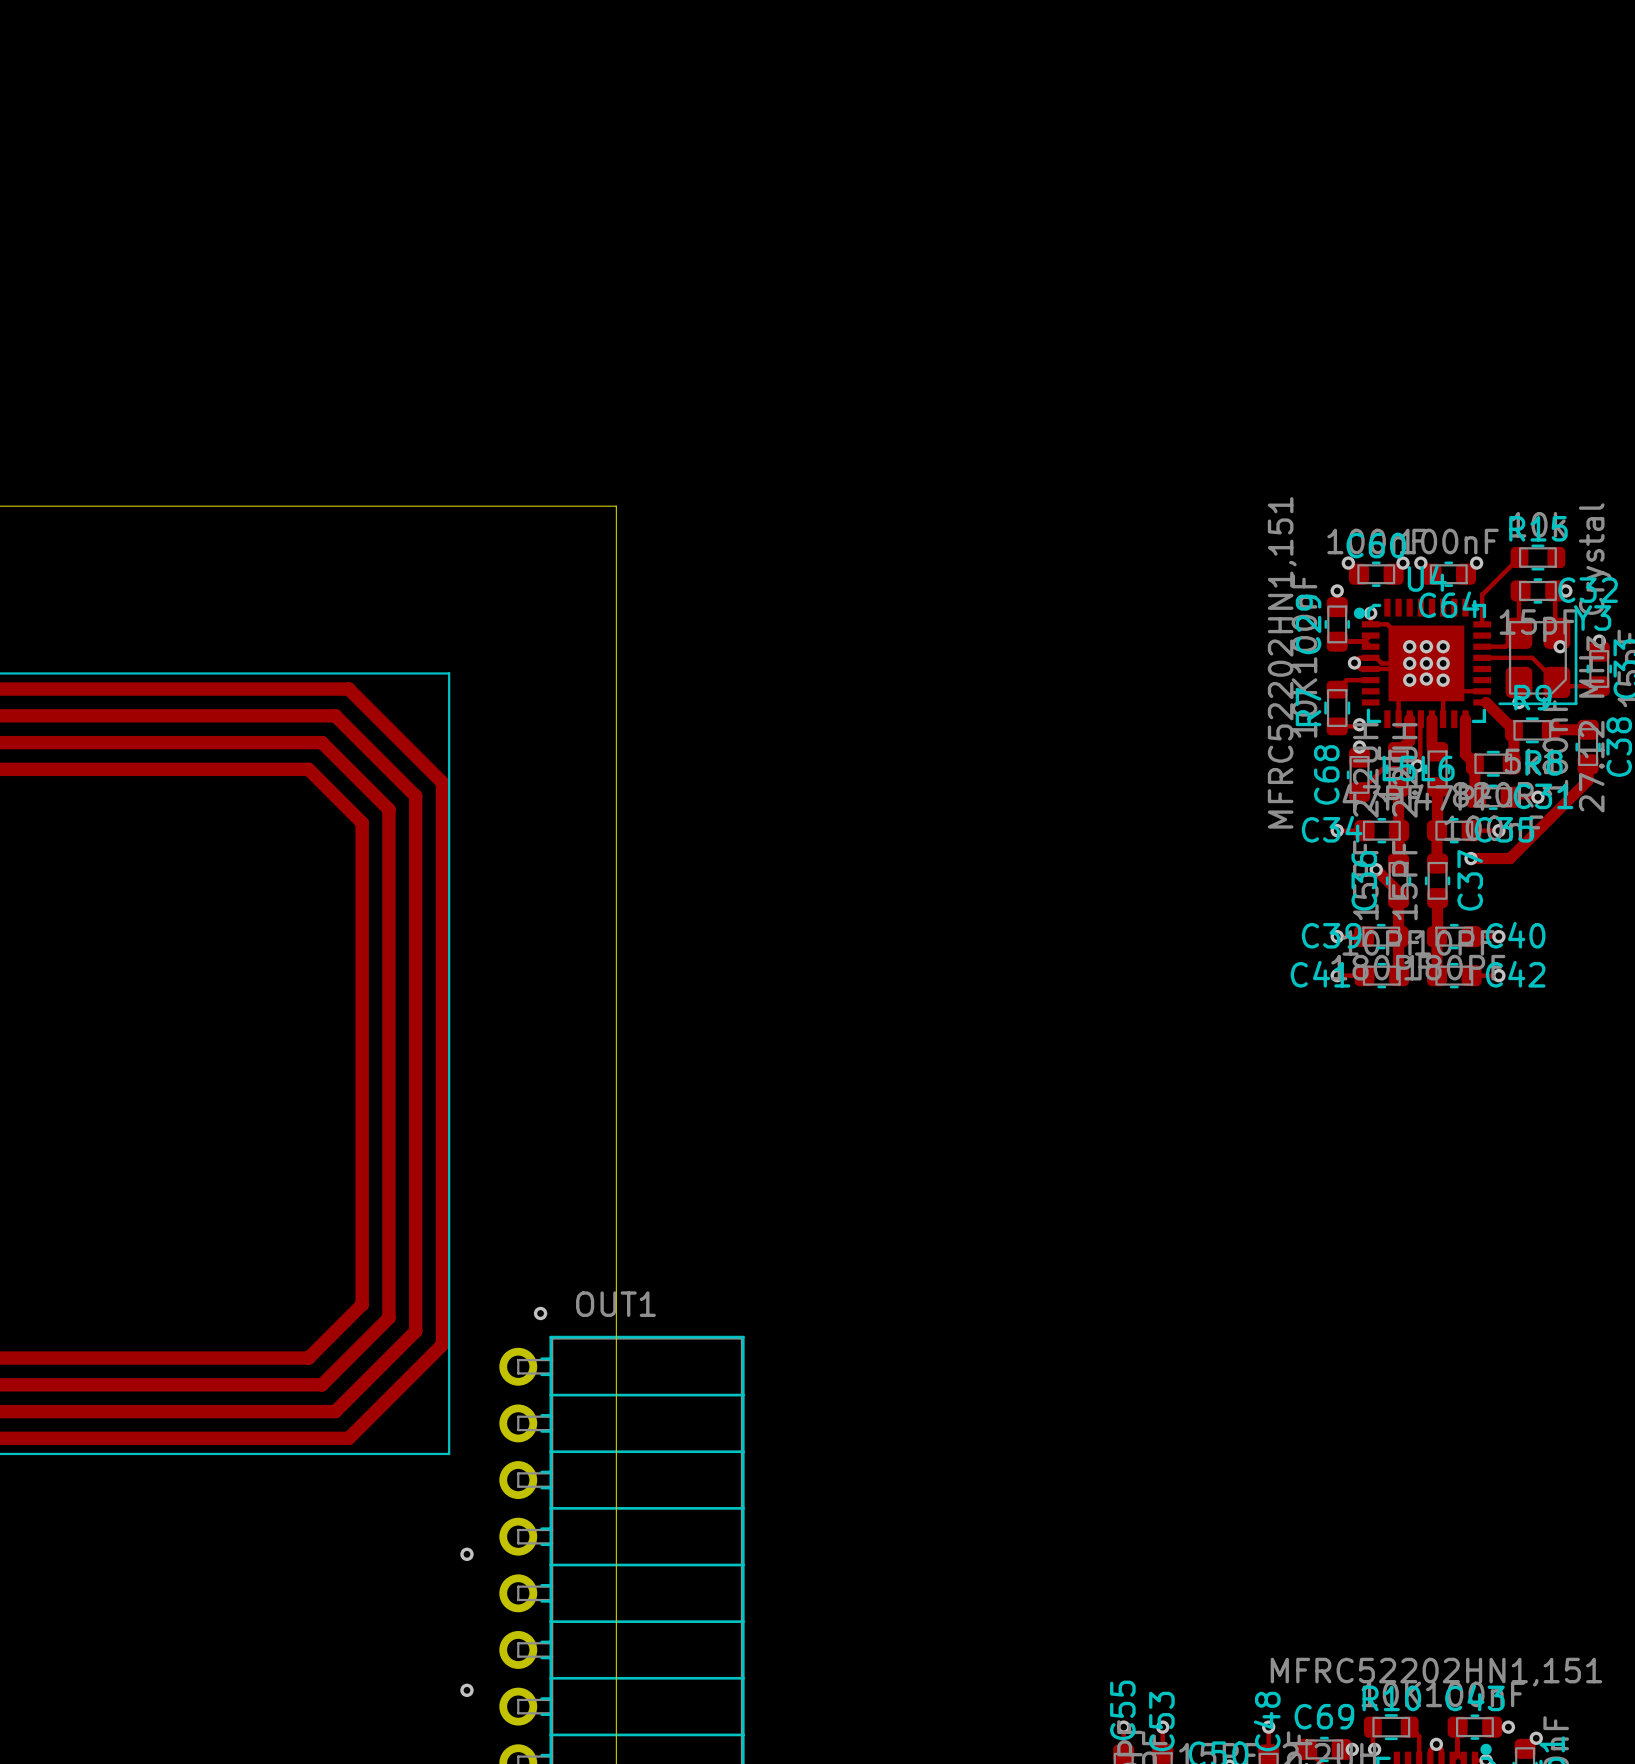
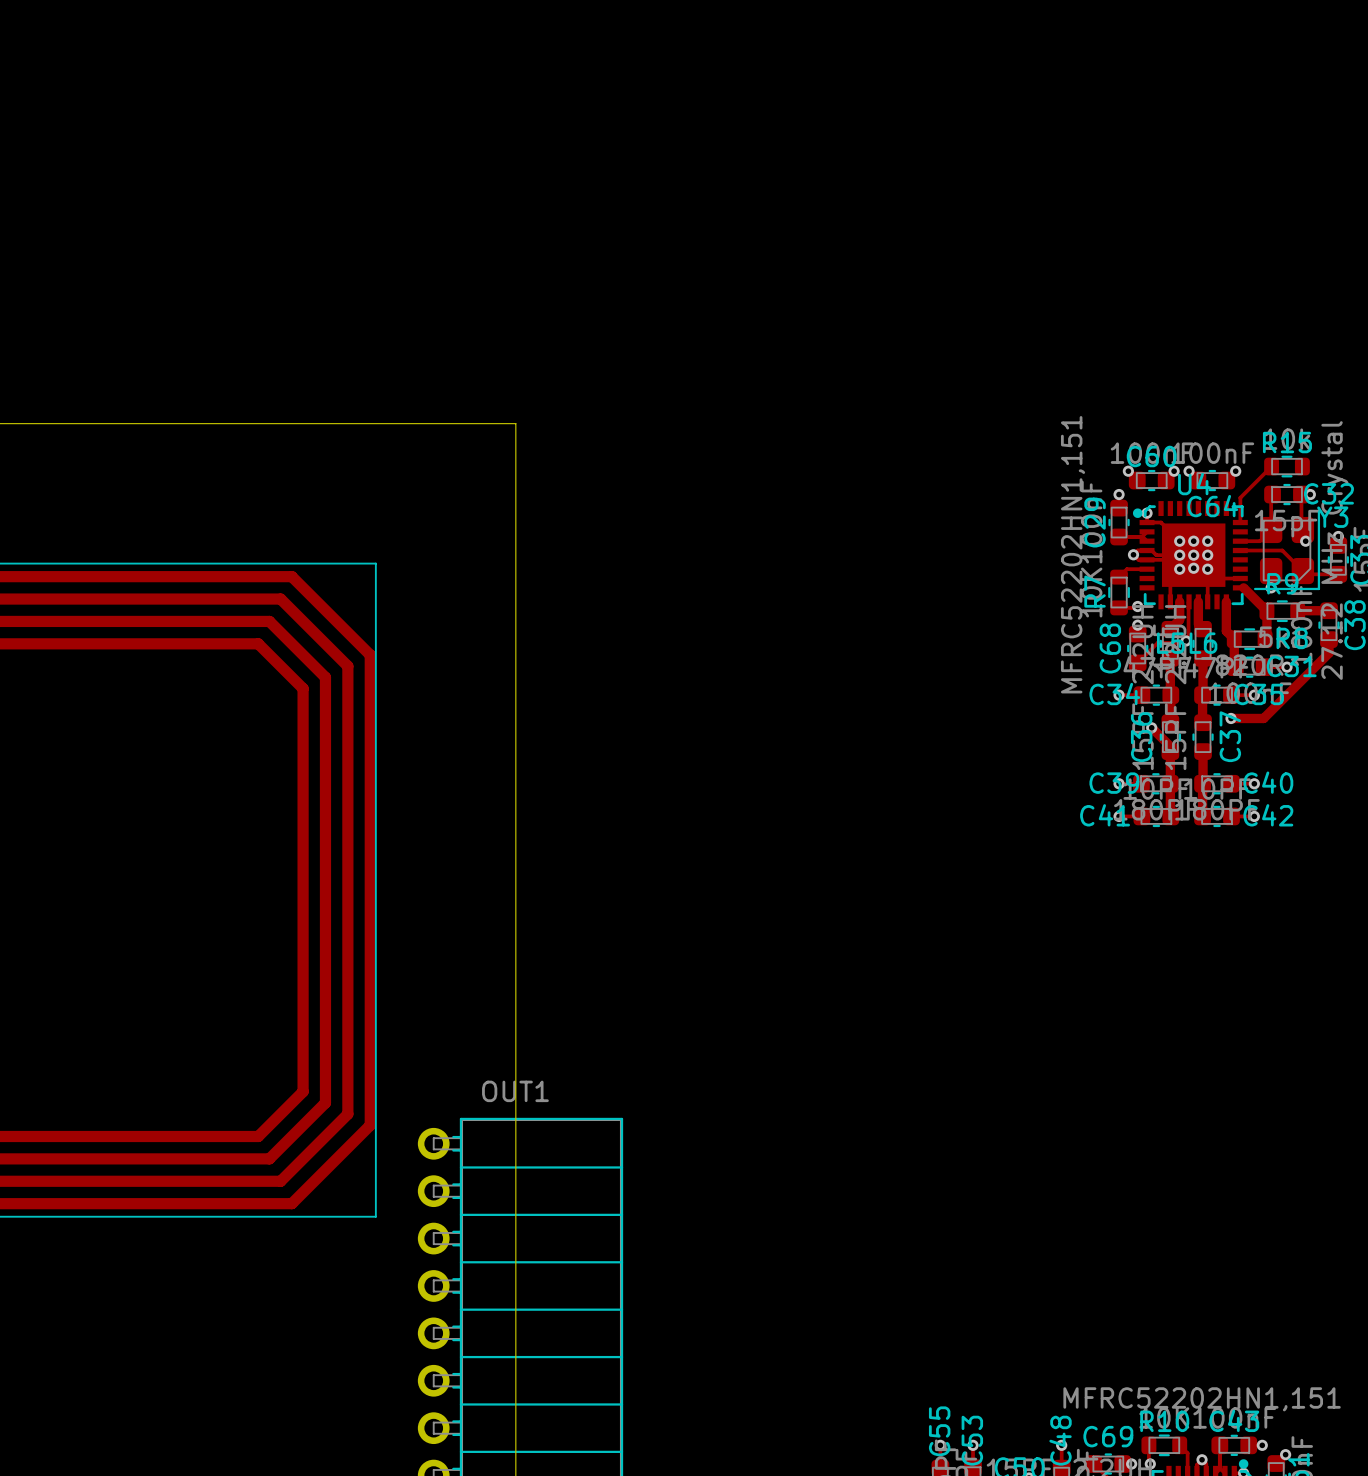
via: (540, 1313) -> none
via: (466, 1554) -> none
via: (466, 1690) -> none

